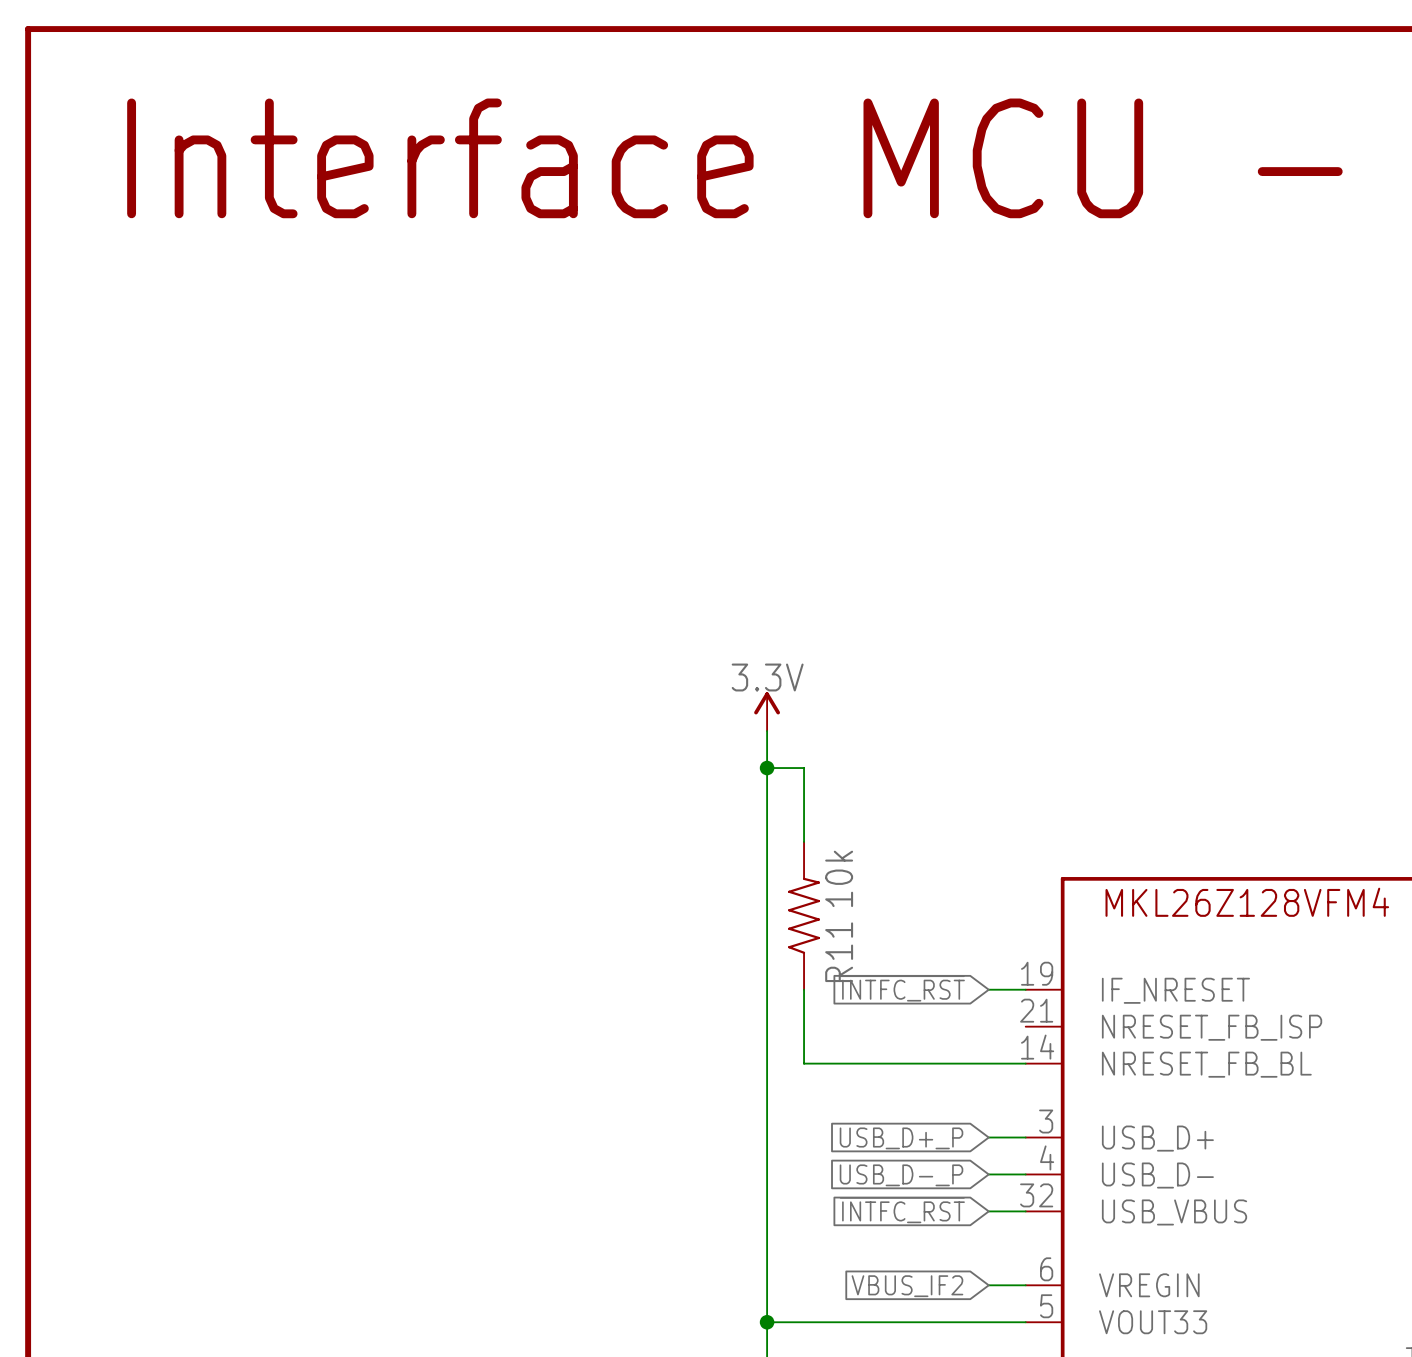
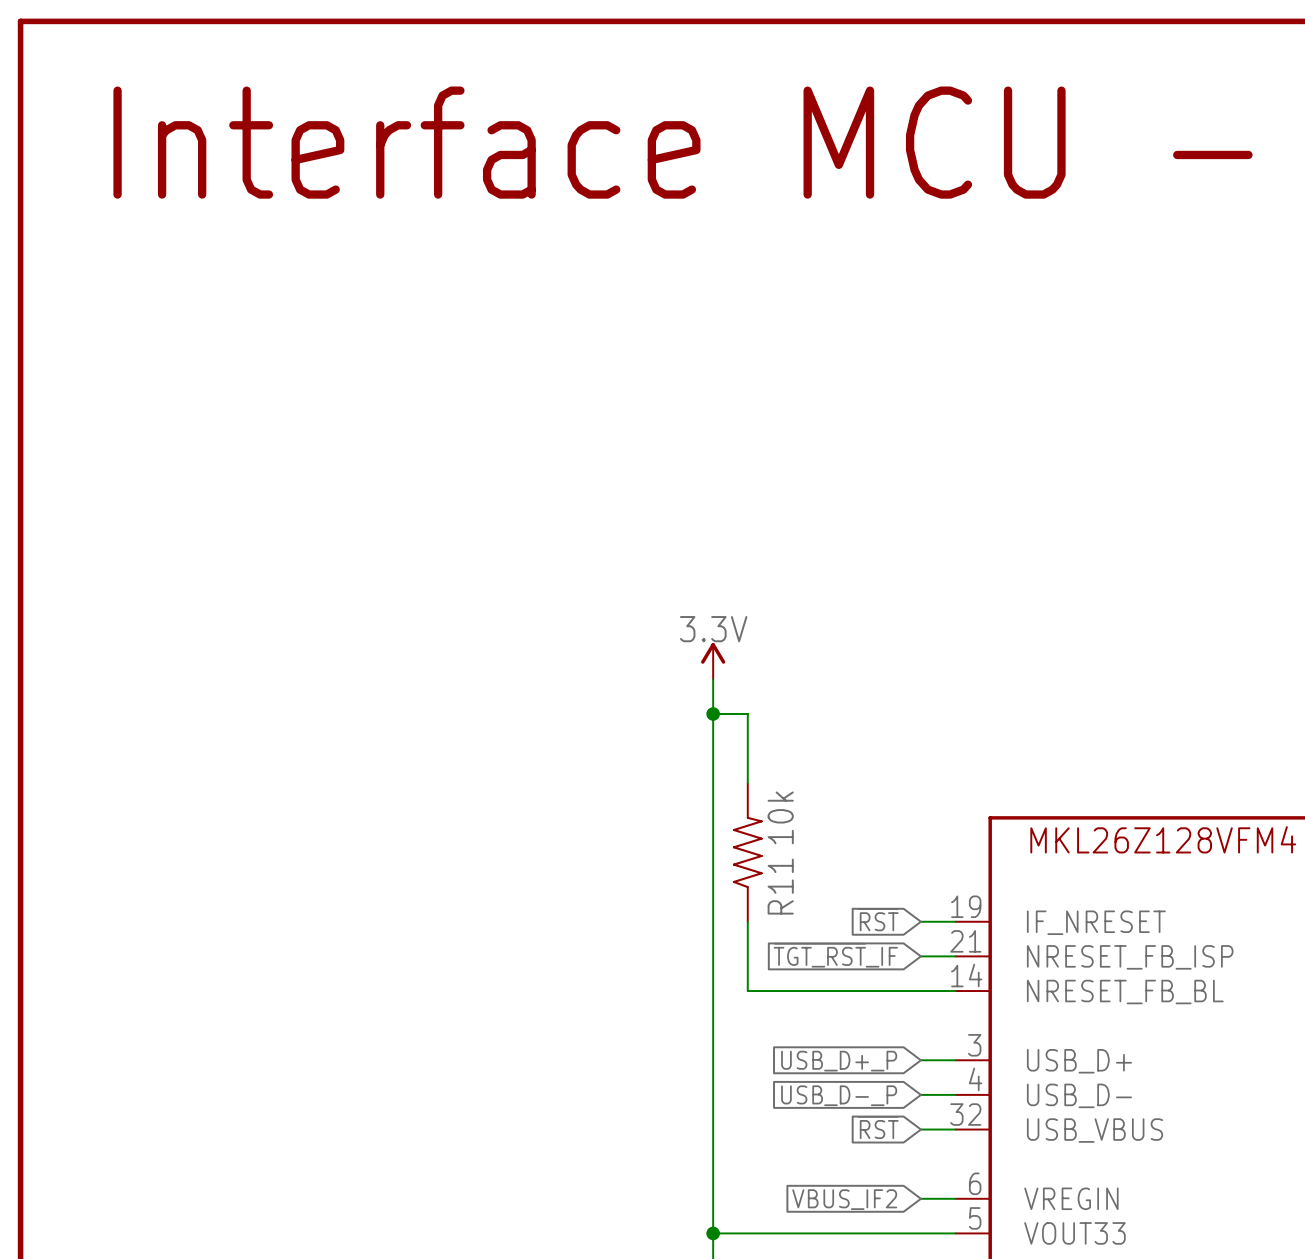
global label: ~{INTFC_RST} (902, 988) -> ~{RST} (878, 919)
global label: none -> ~{TGT_RST}_IF (835, 955)
wire: none -> (920, 956) (955, 956)
global label: ~{INTFC_RST} (902, 1210) -> ~{RST} (878, 1127)

